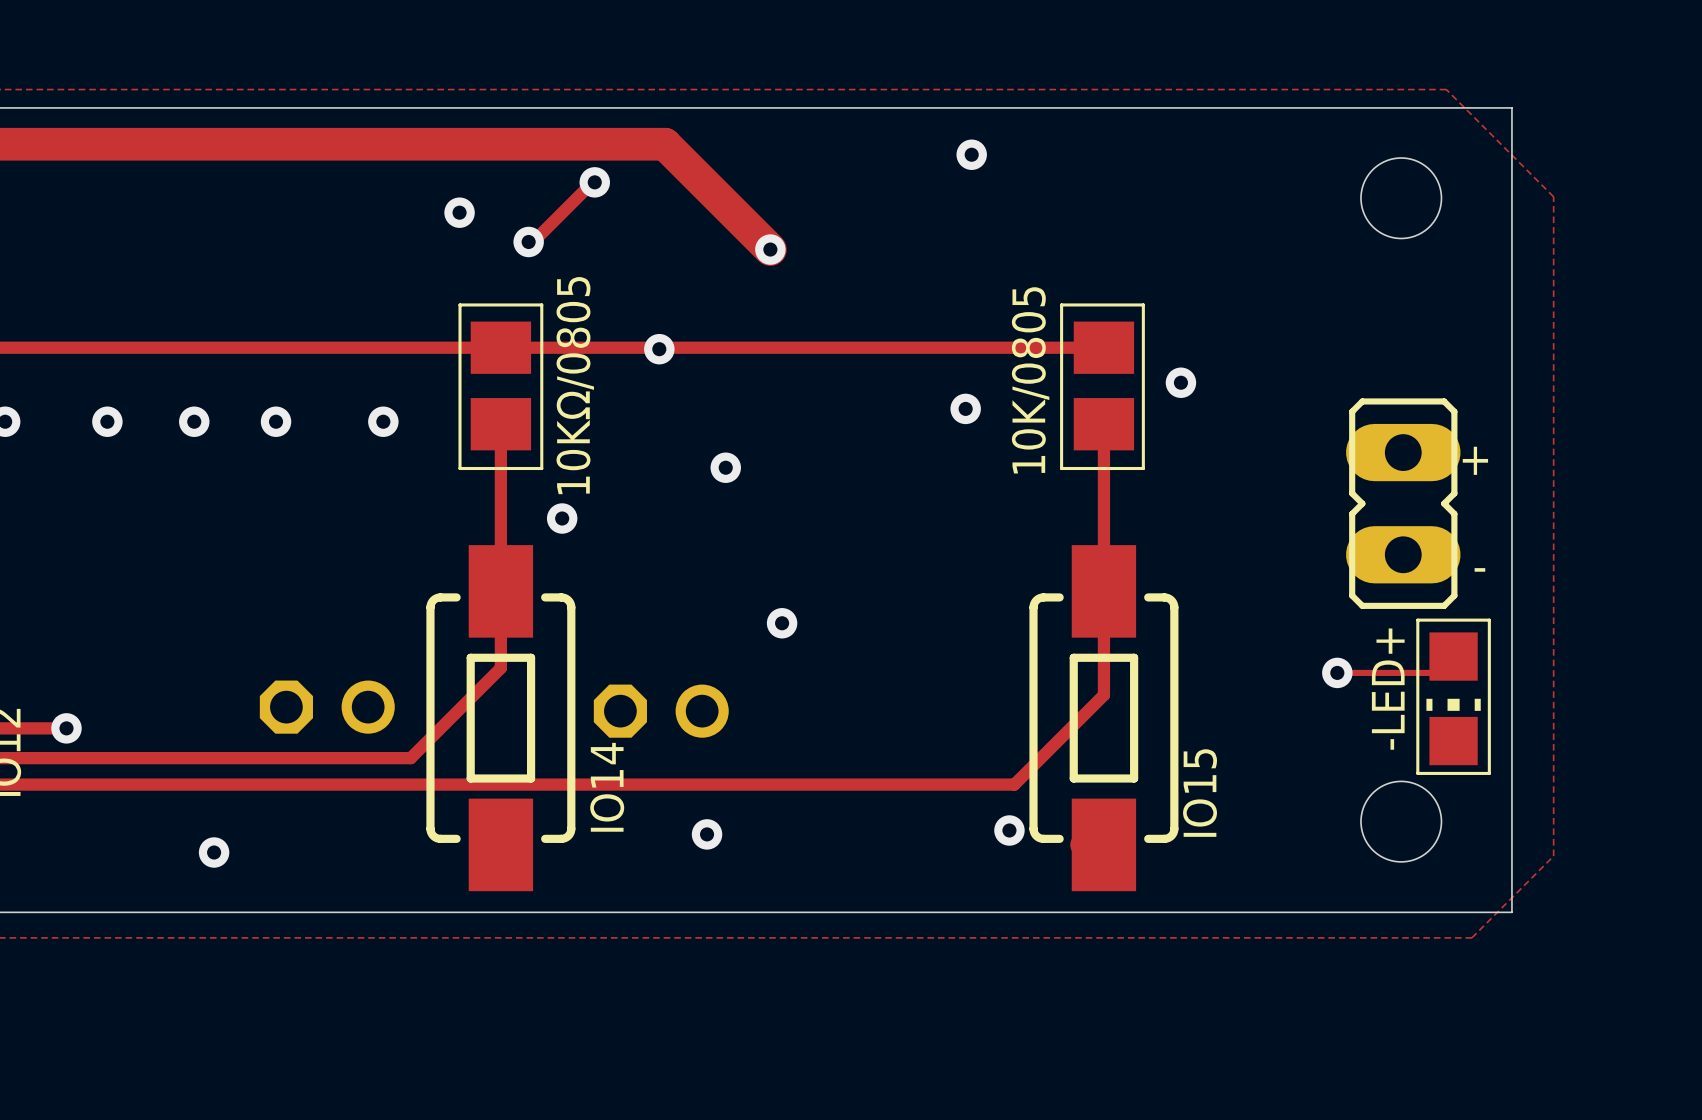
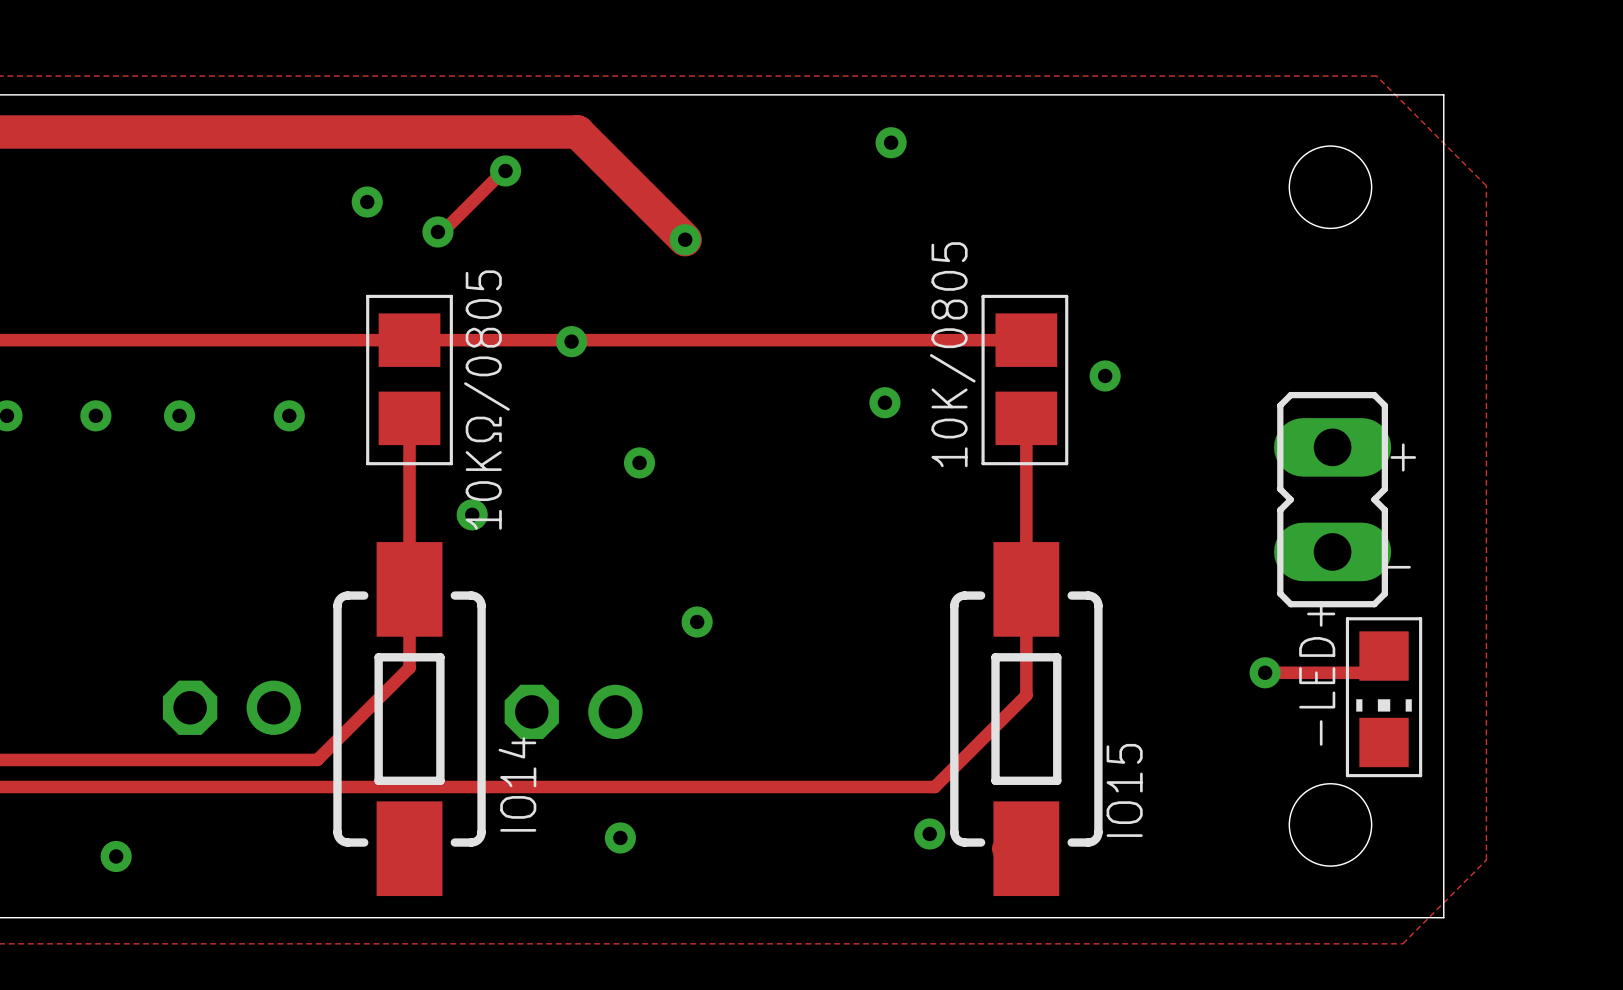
track width: thin (1337, 672) (1437, 672) -> thick (1265, 672) (1367, 672)

